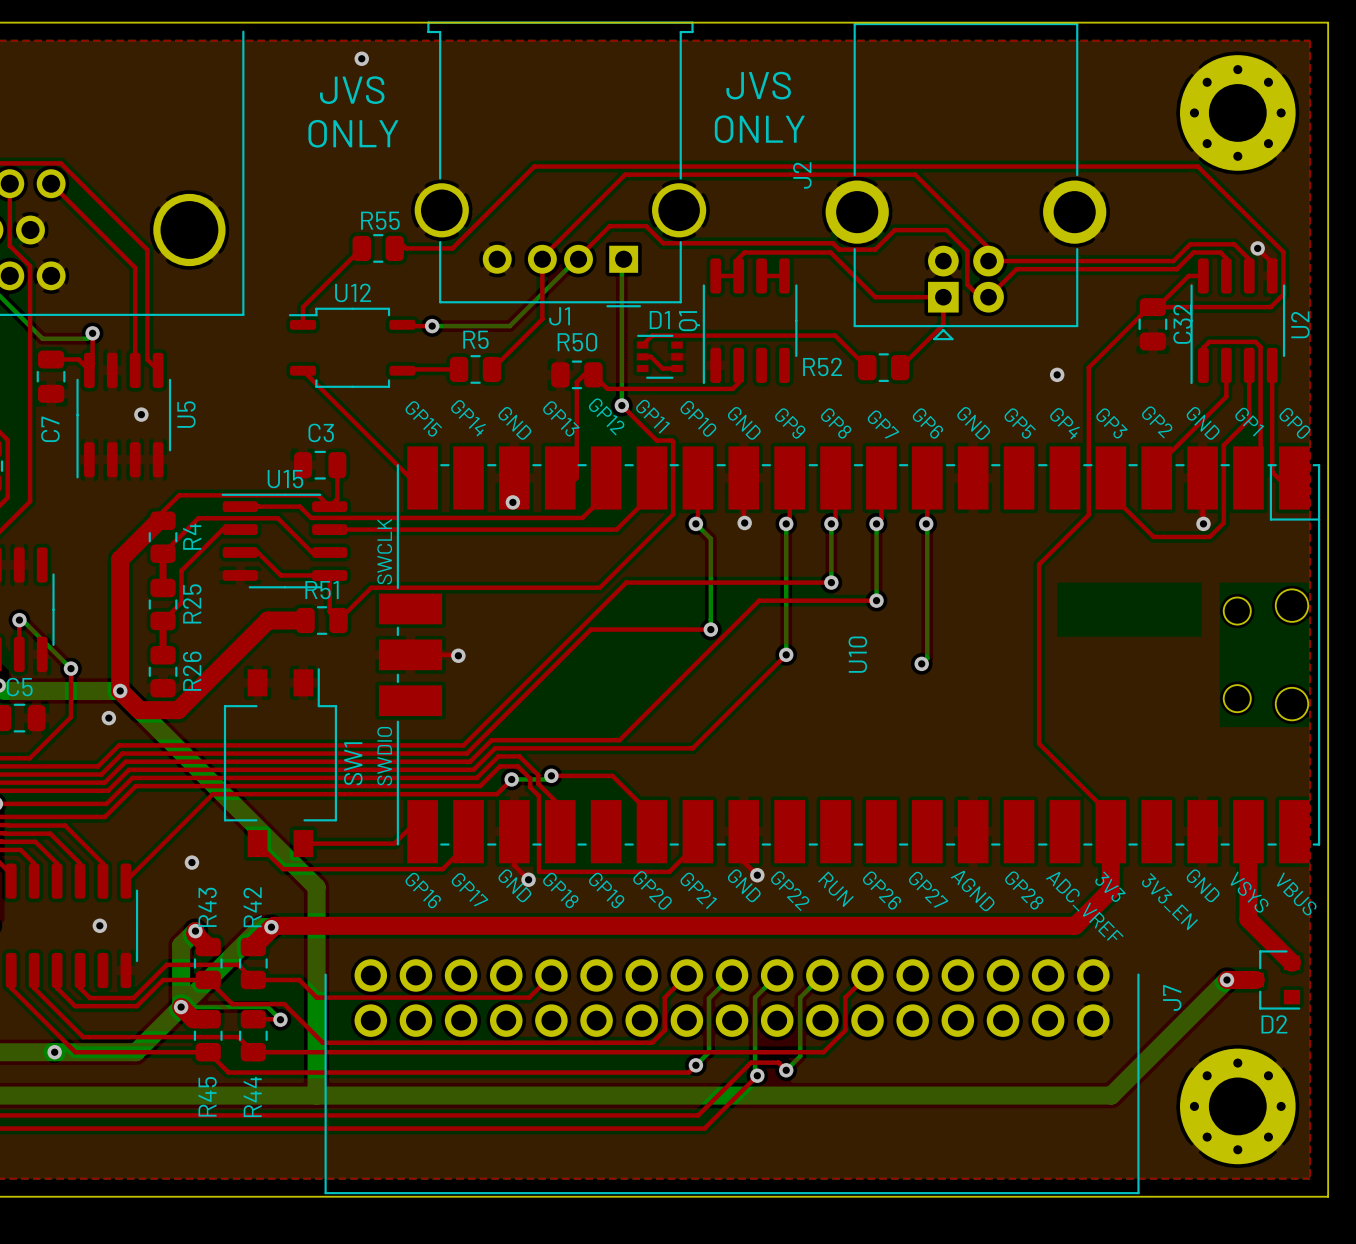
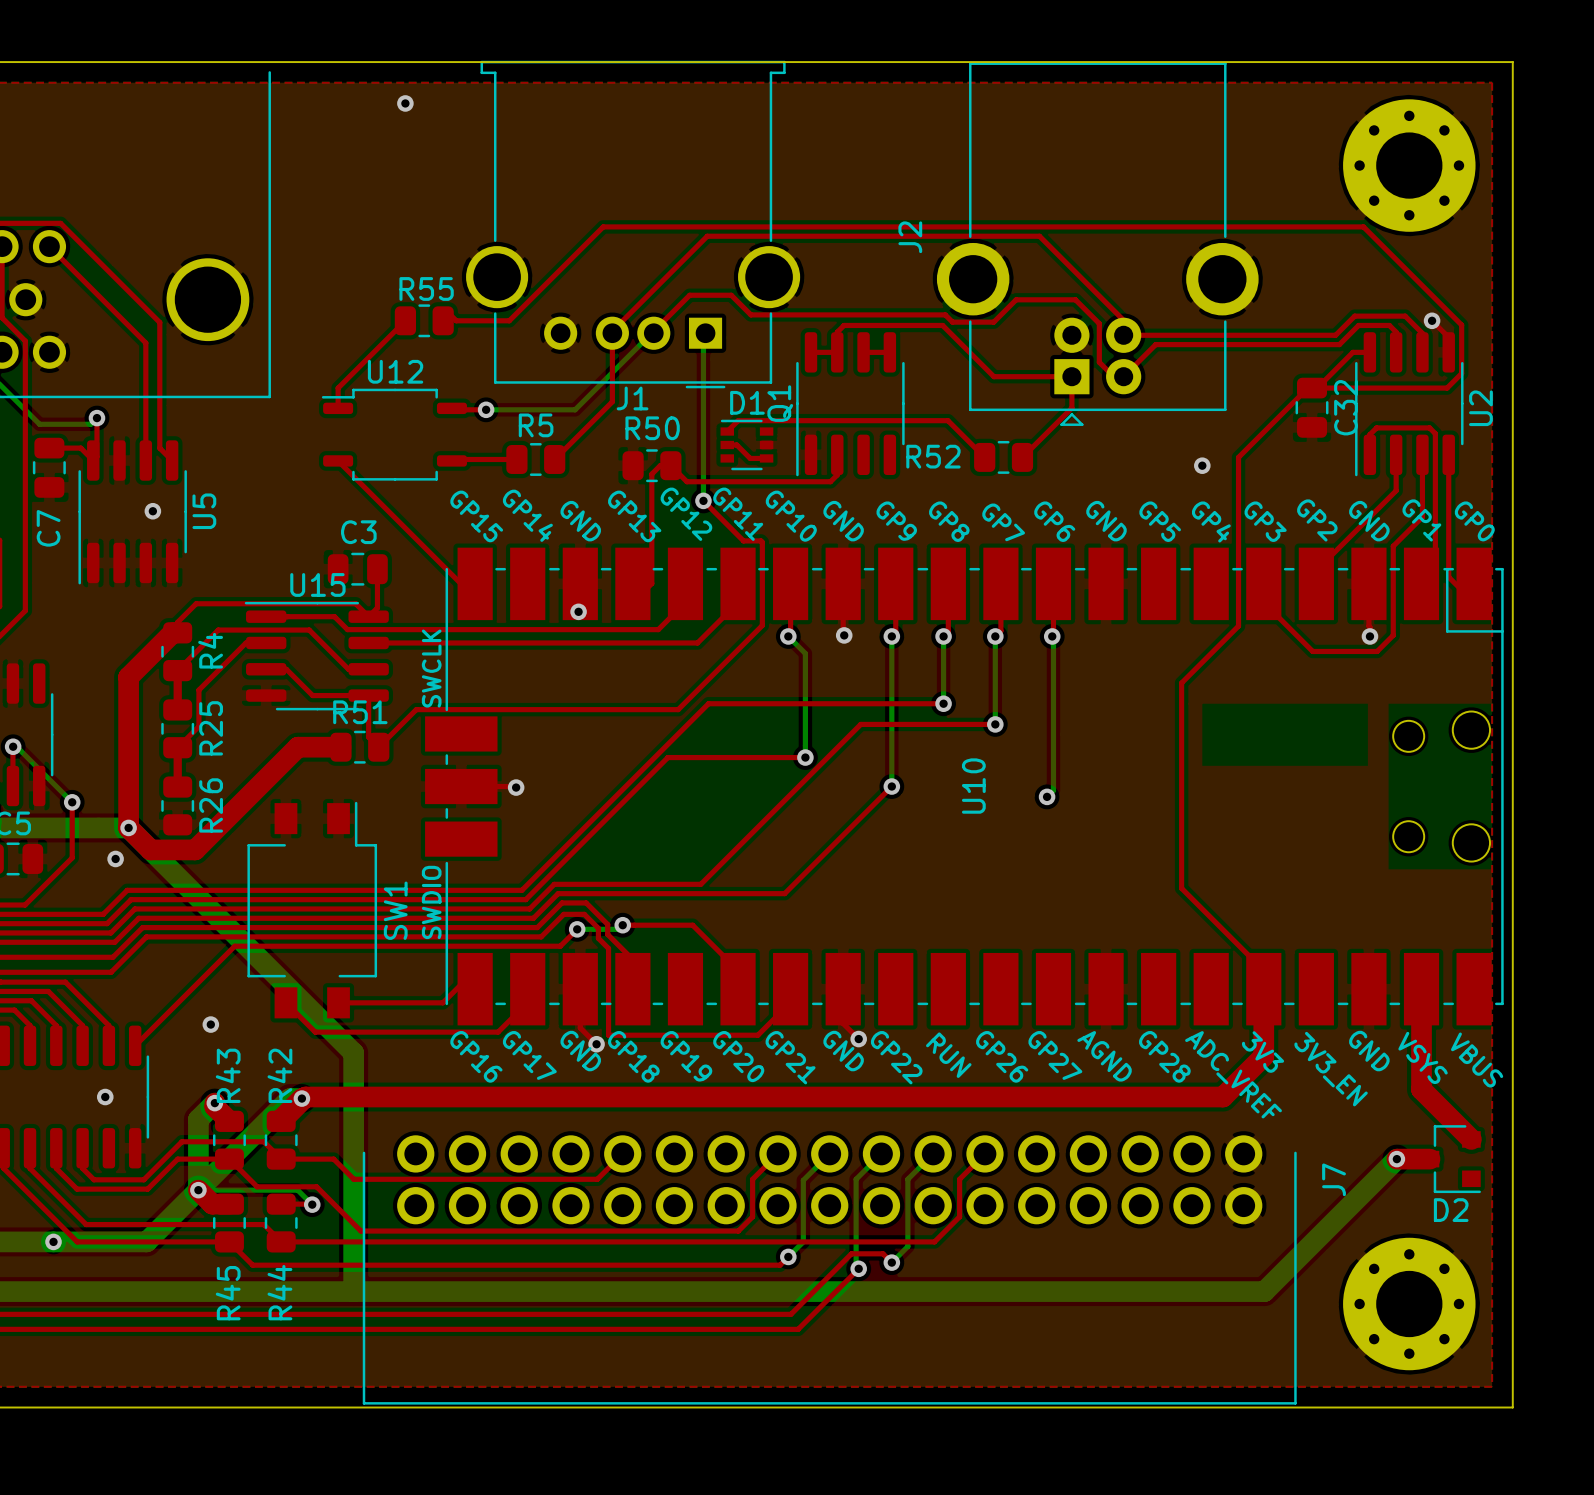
text: JVS (758, 85) -> none
text: JVS (352, 90) -> none
text: ONLY (759, 129) -> none
text: ONLY (353, 133) -> none

